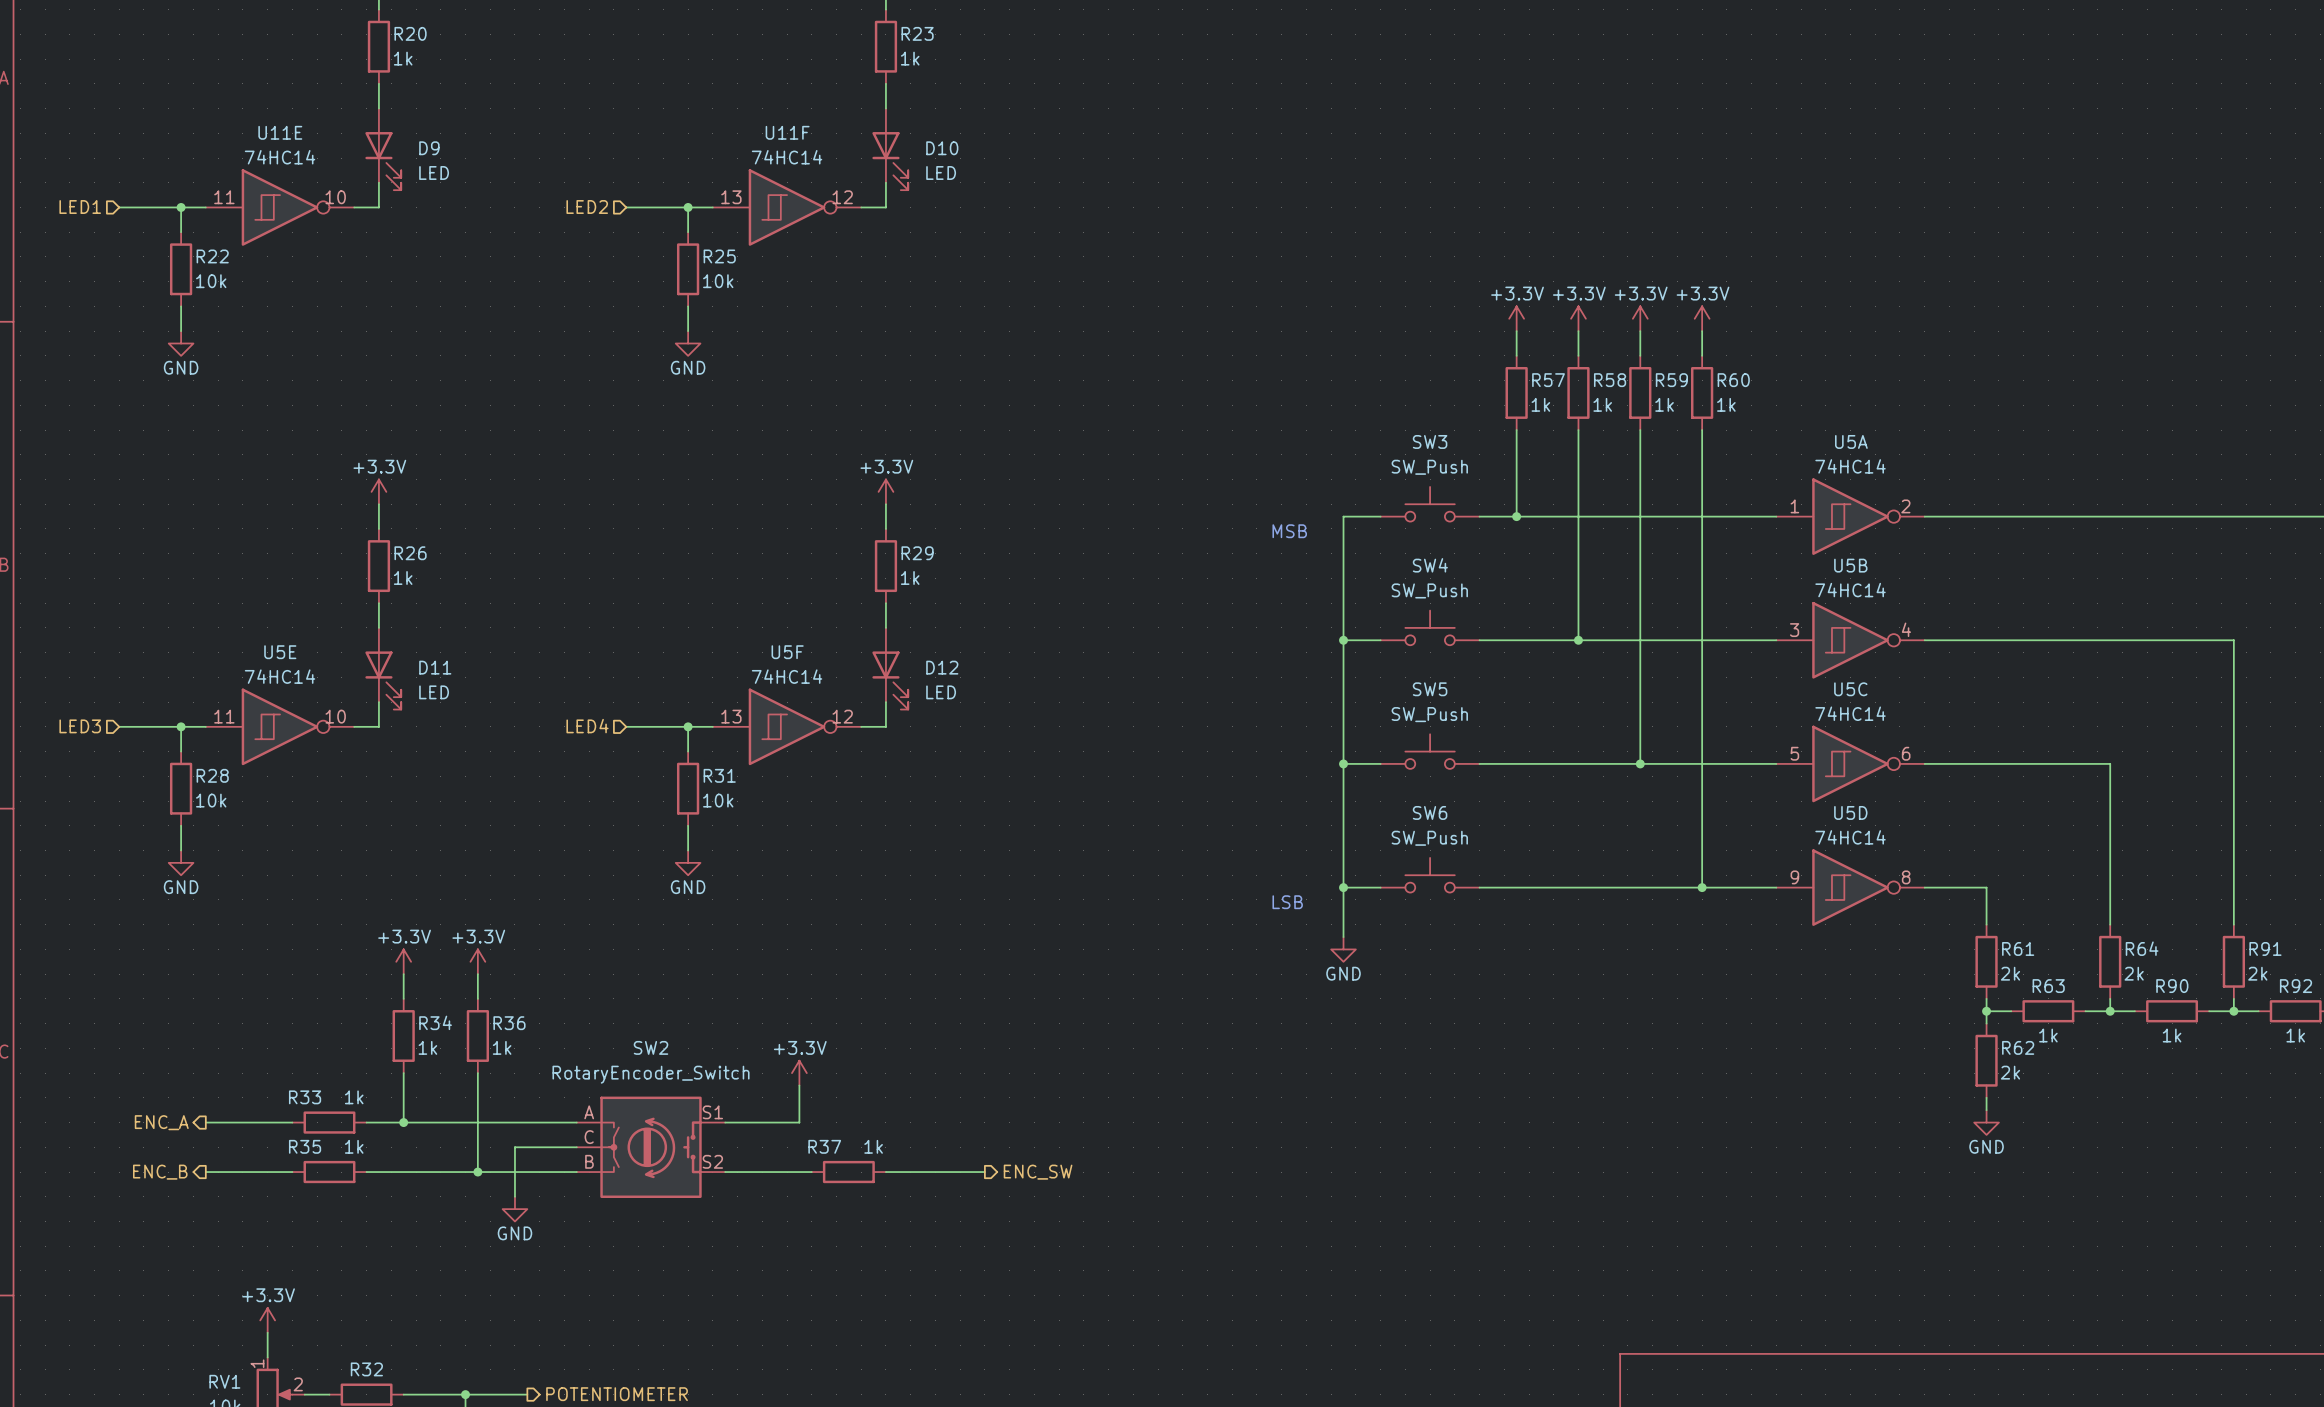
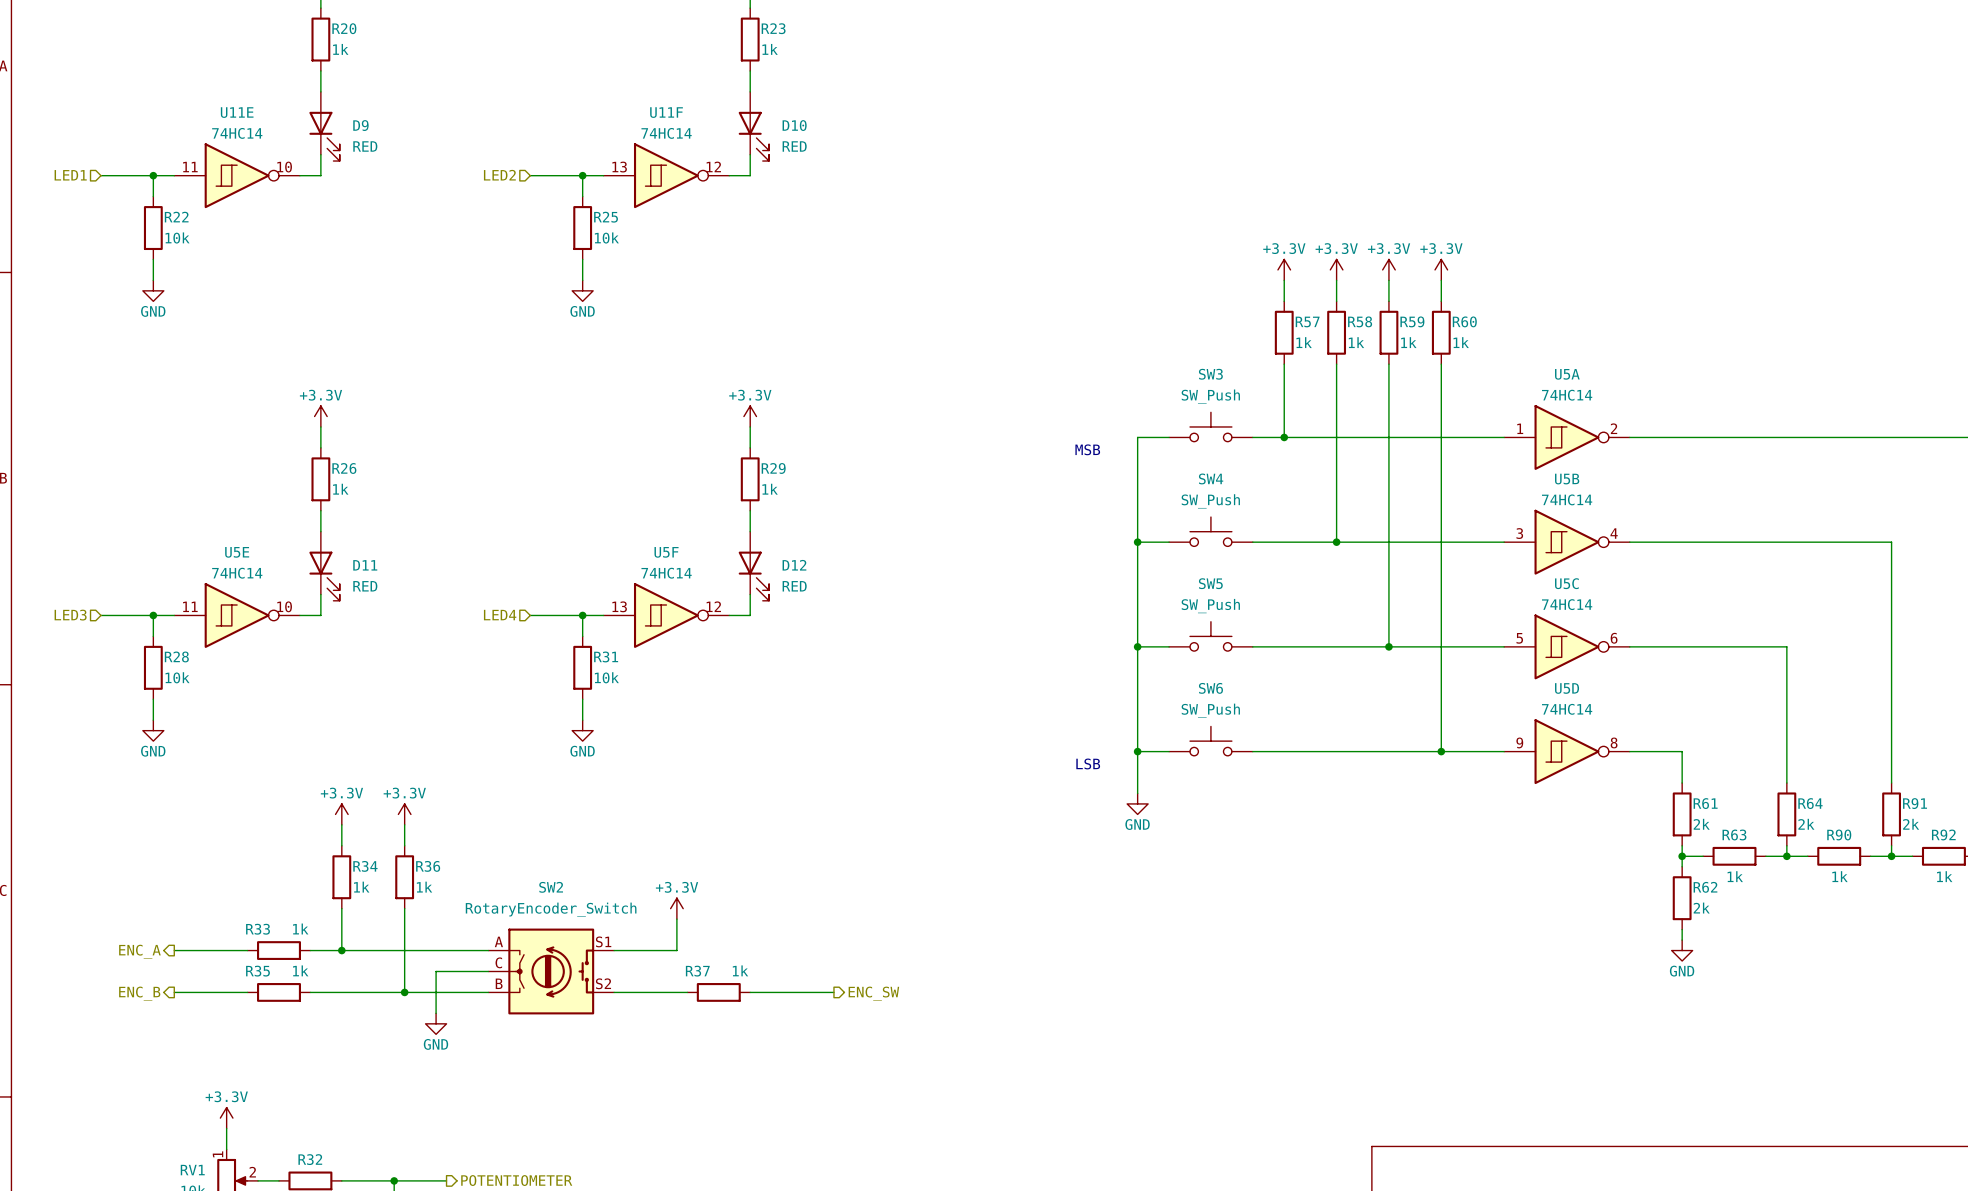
D9 value: LED (434, 172) -> RED (365, 146)
D10 value: LED (941, 172) -> RED (794, 146)
D11 value: LED (434, 692) -> RED (365, 586)
D12 value: LED (941, 692) -> RED (794, 586)

